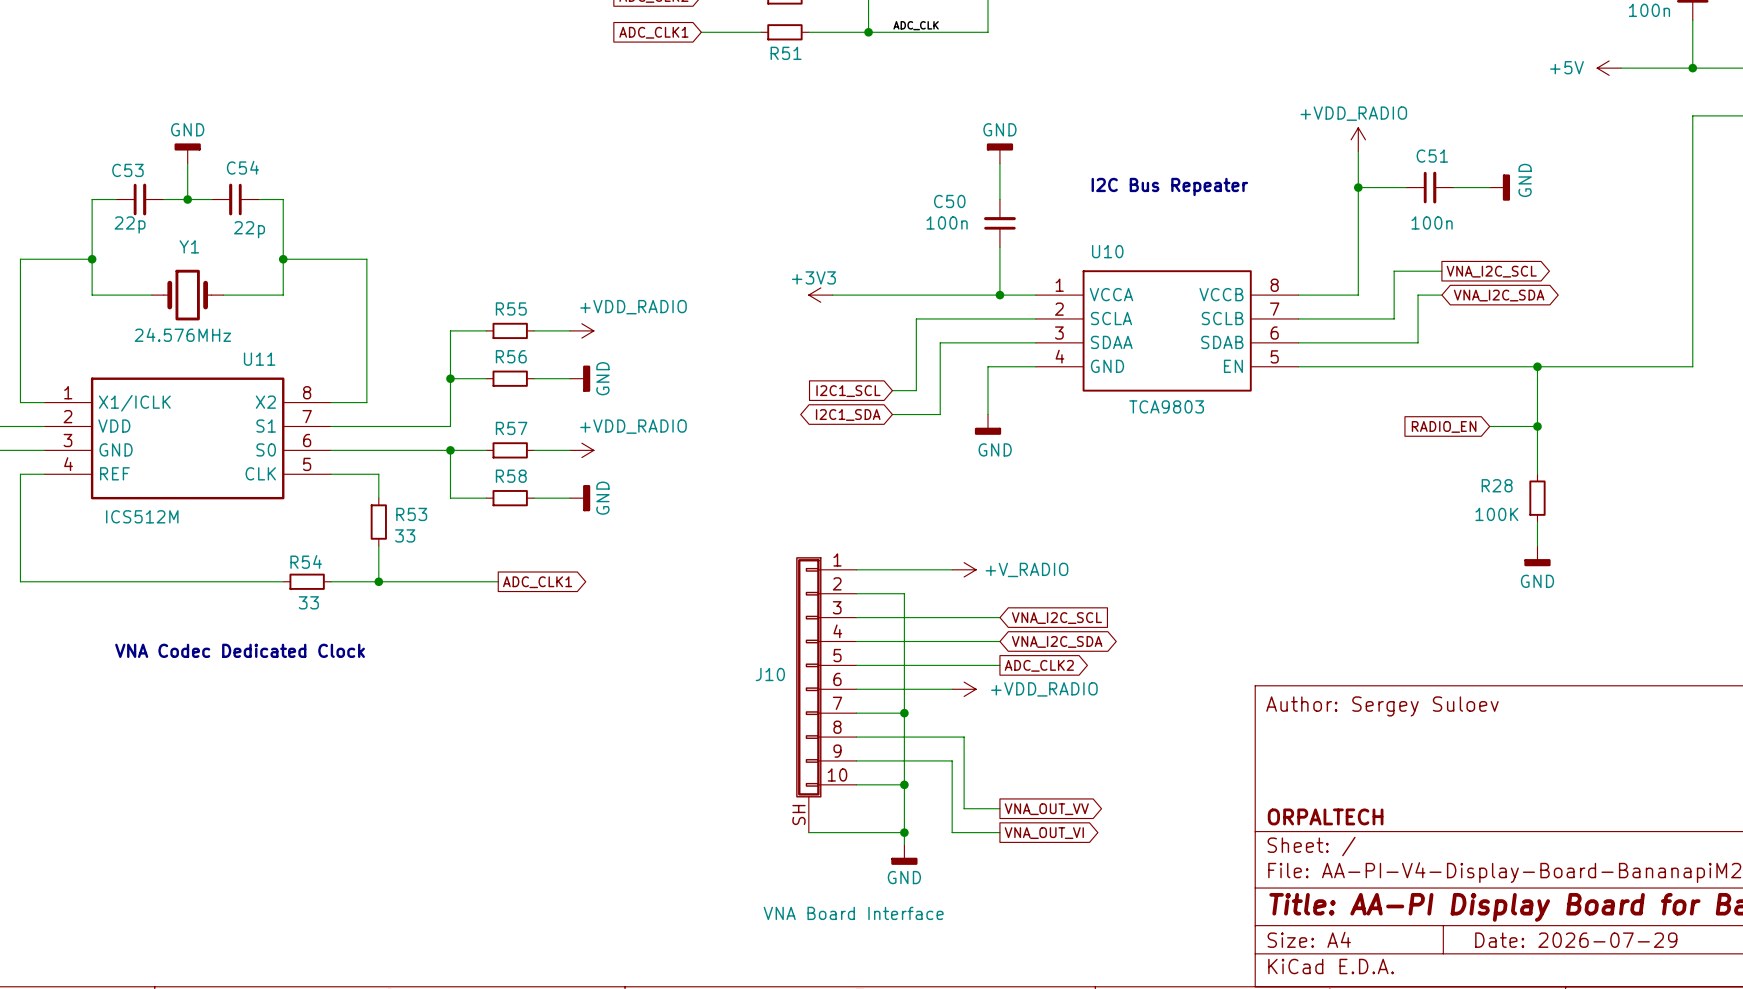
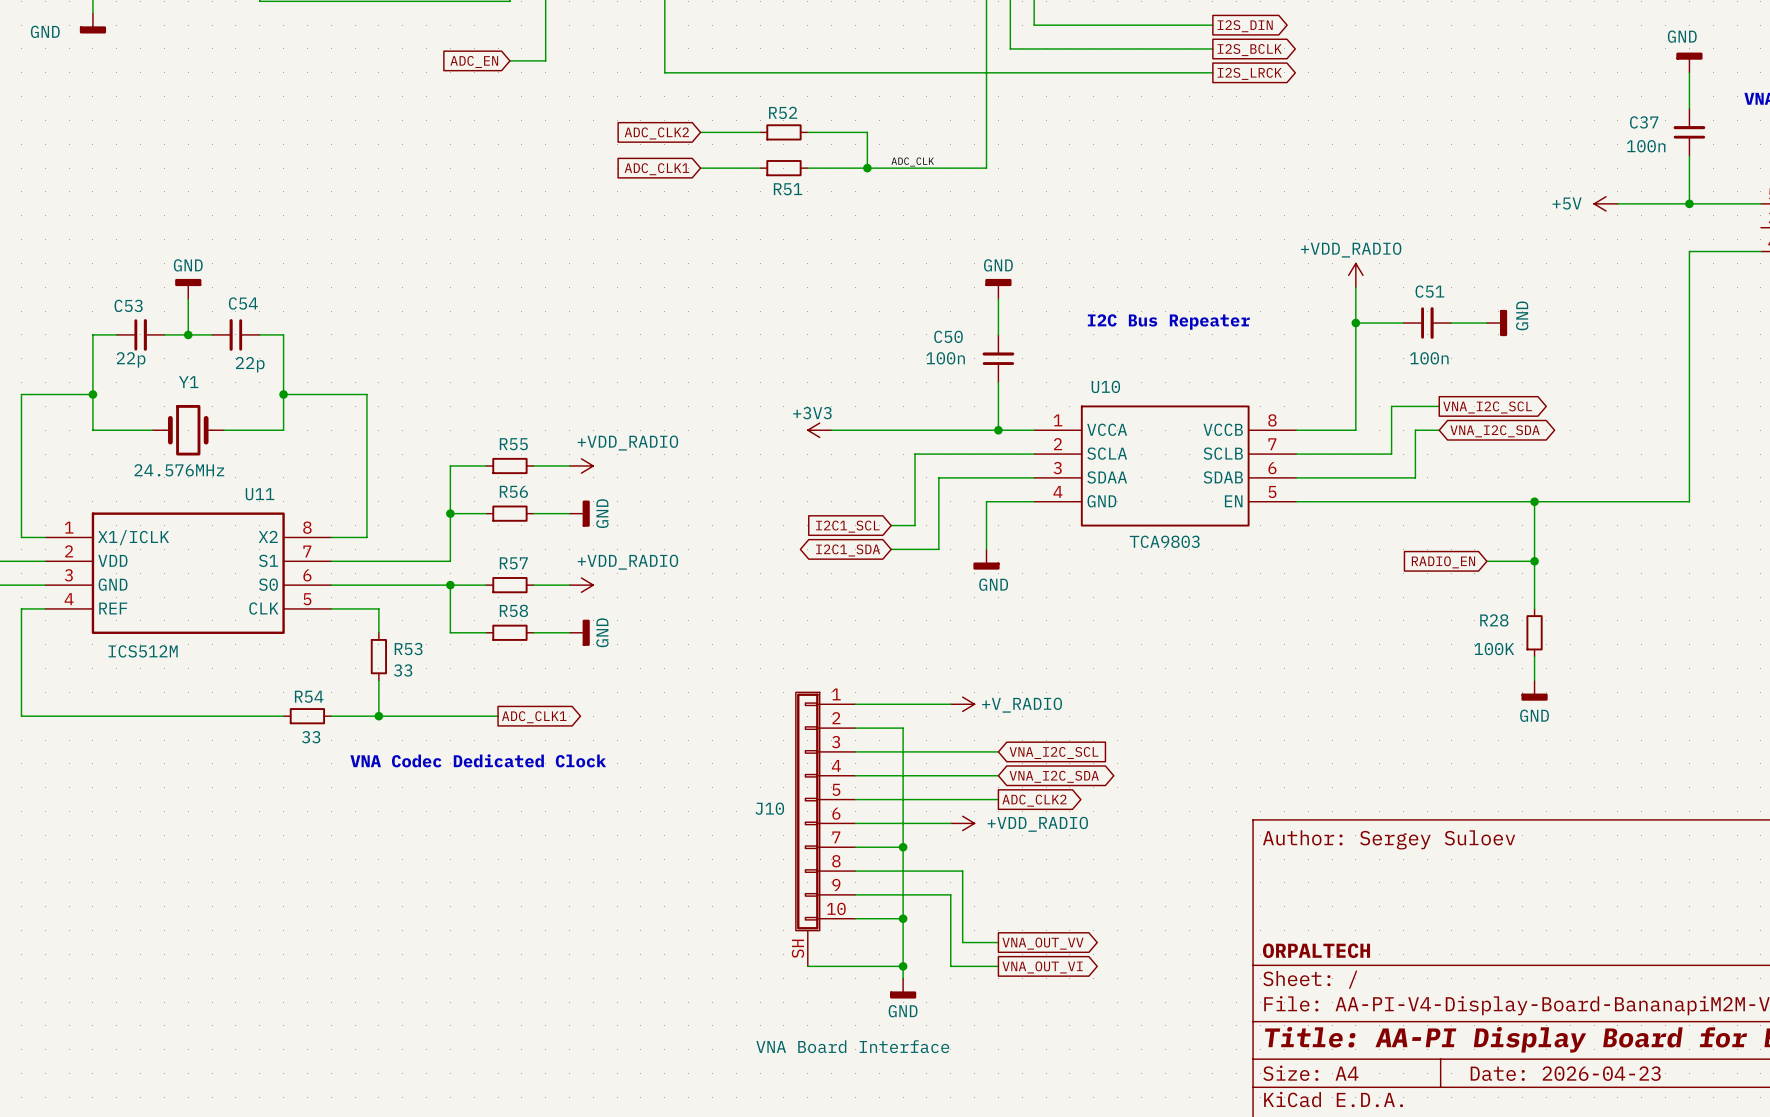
text: none -> VNA Codec Dedicated Clock (478, 760)
text: VNA Codec Dedicated Clock (240, 650) -> none
title block: Date: 2026-07-29 (1576, 940) -> Date: 2026-04-23 (1565, 1073)

